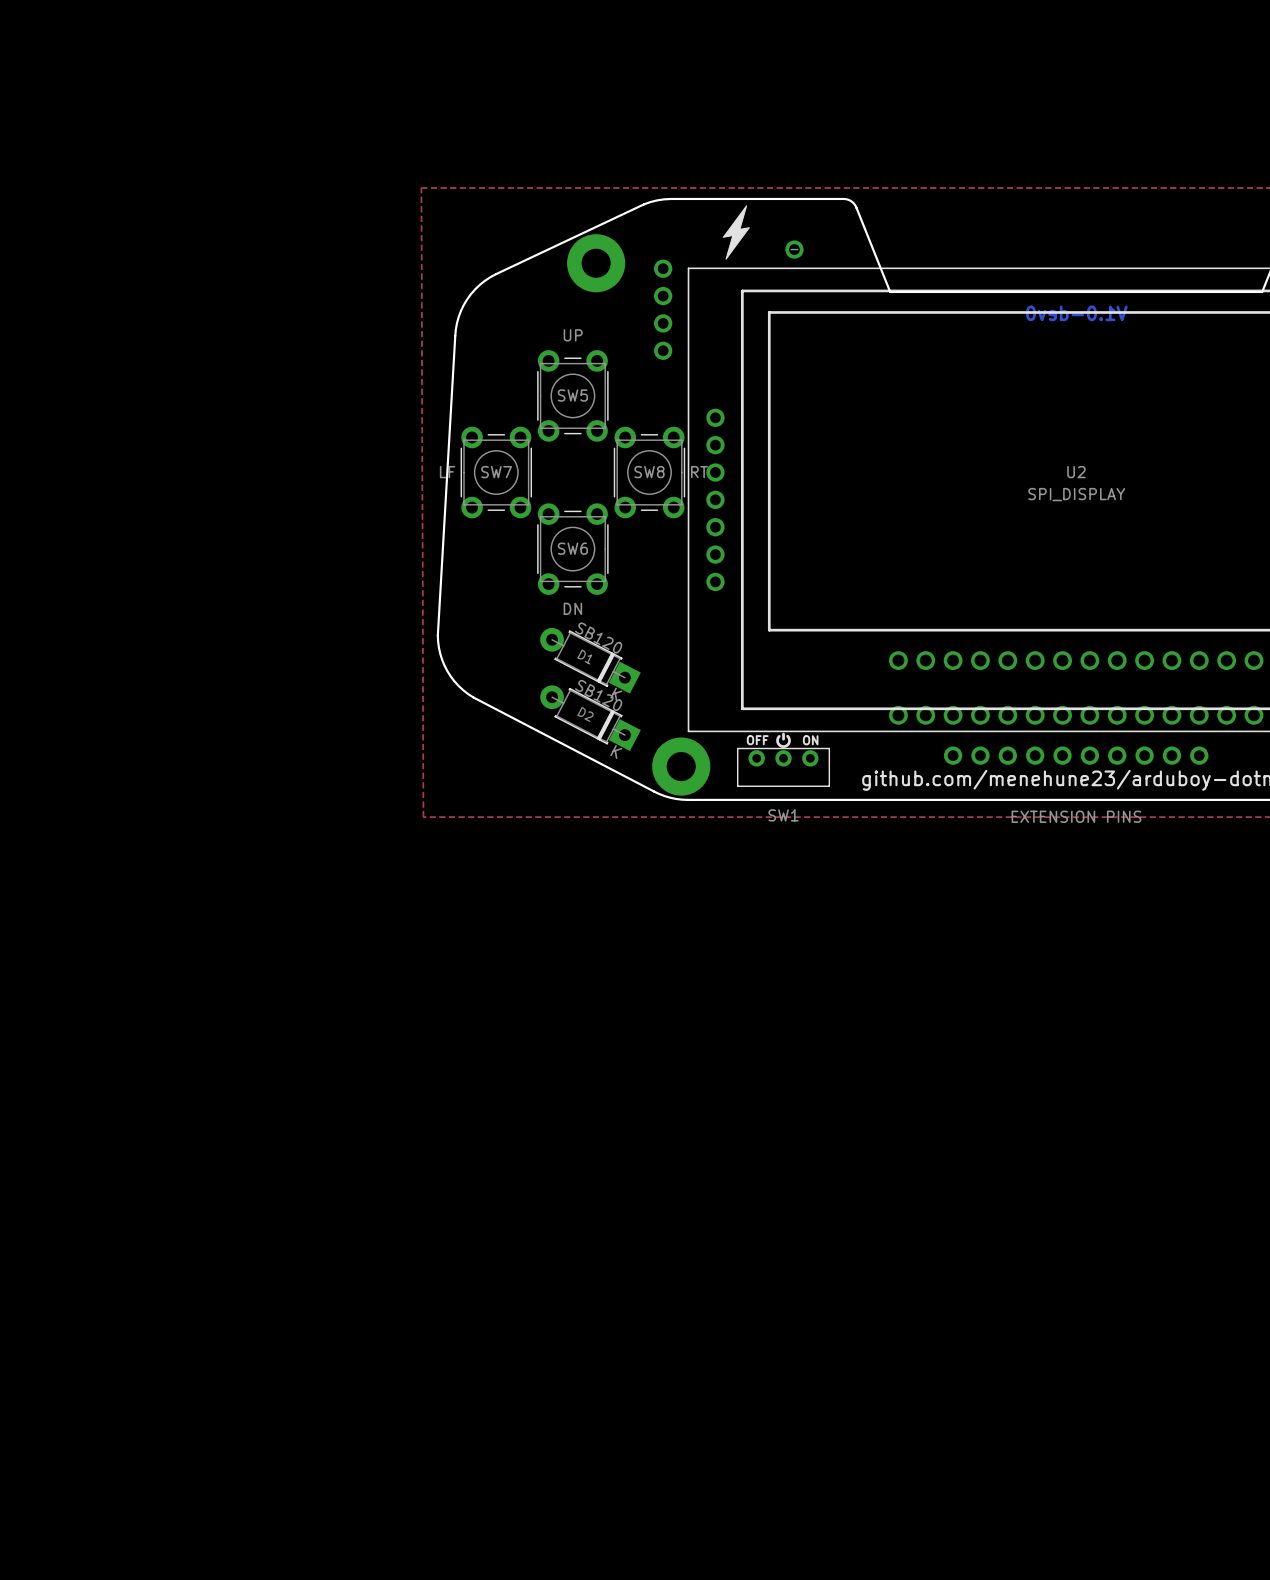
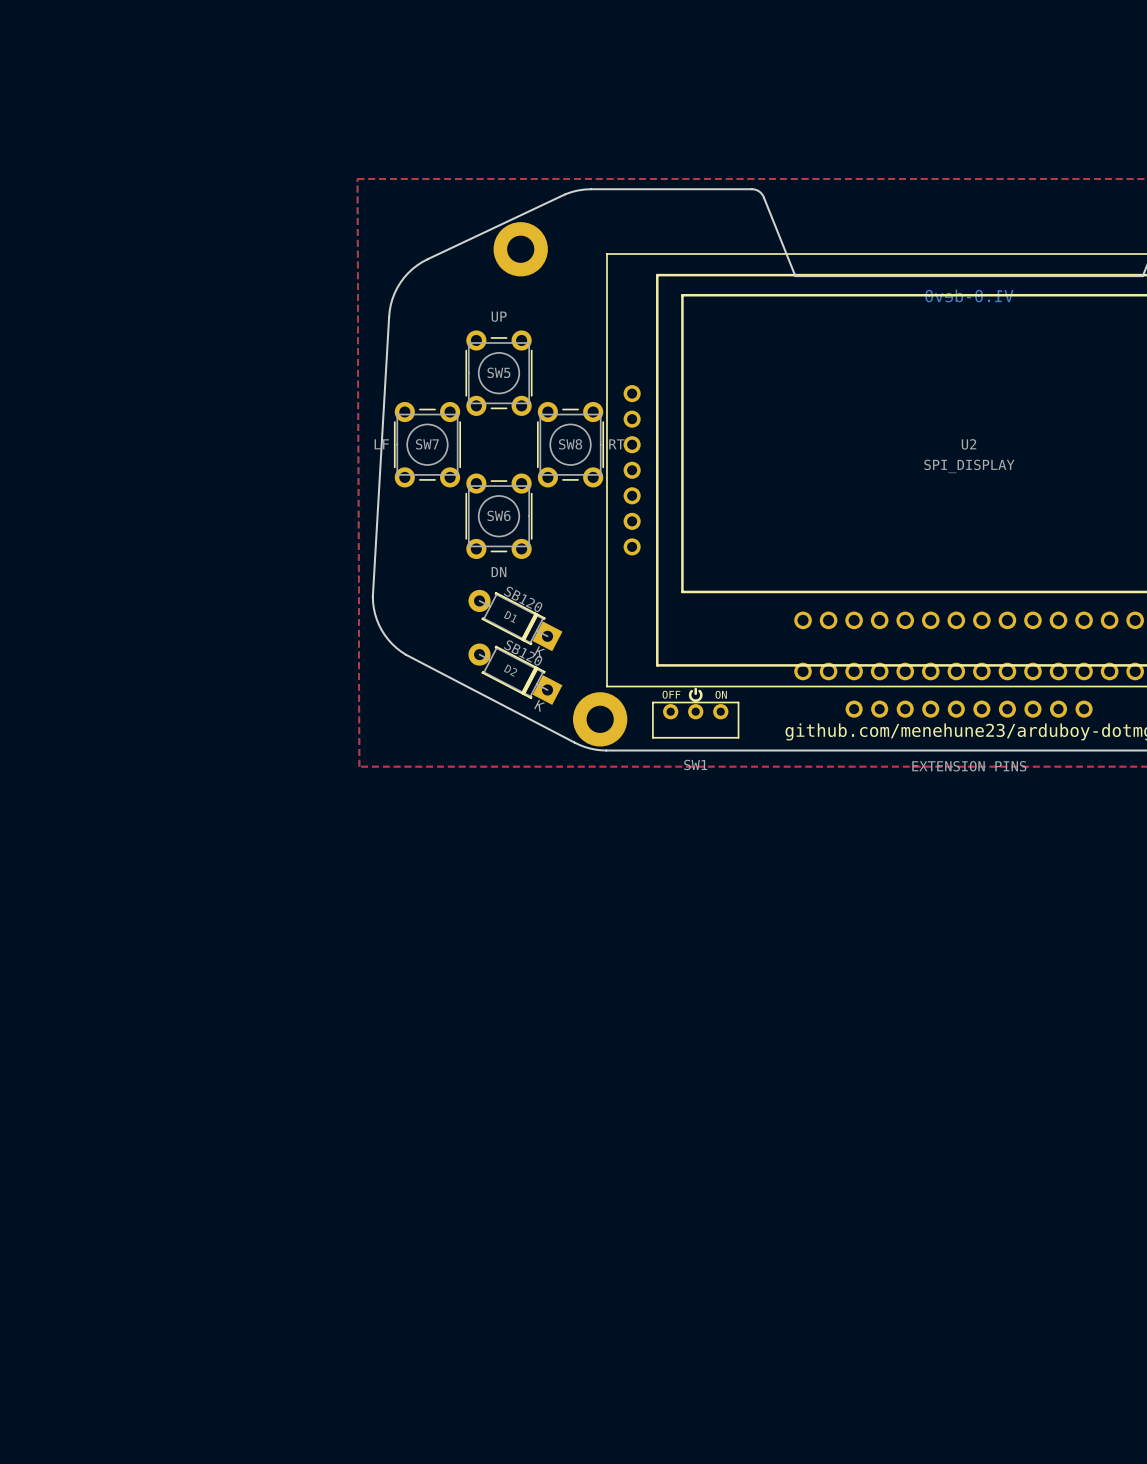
drawing: [722, 205, 750, 260] -> none
part: (794, 249) -> none
part: (663, 309) -> none

